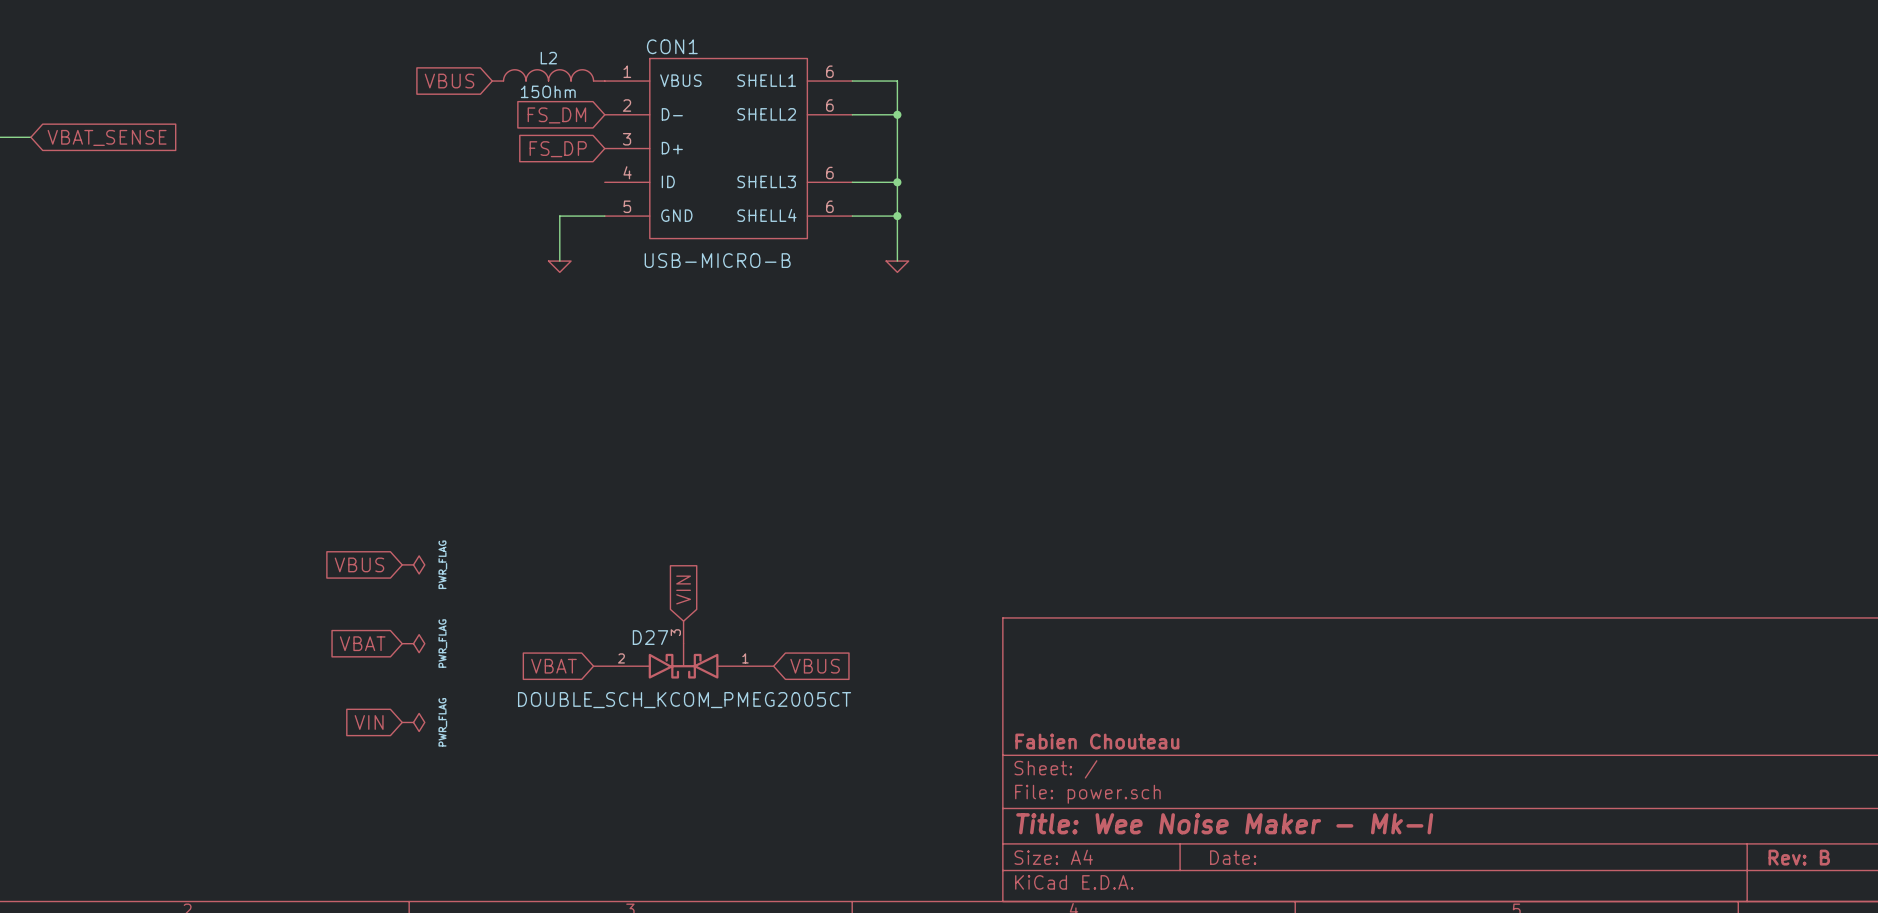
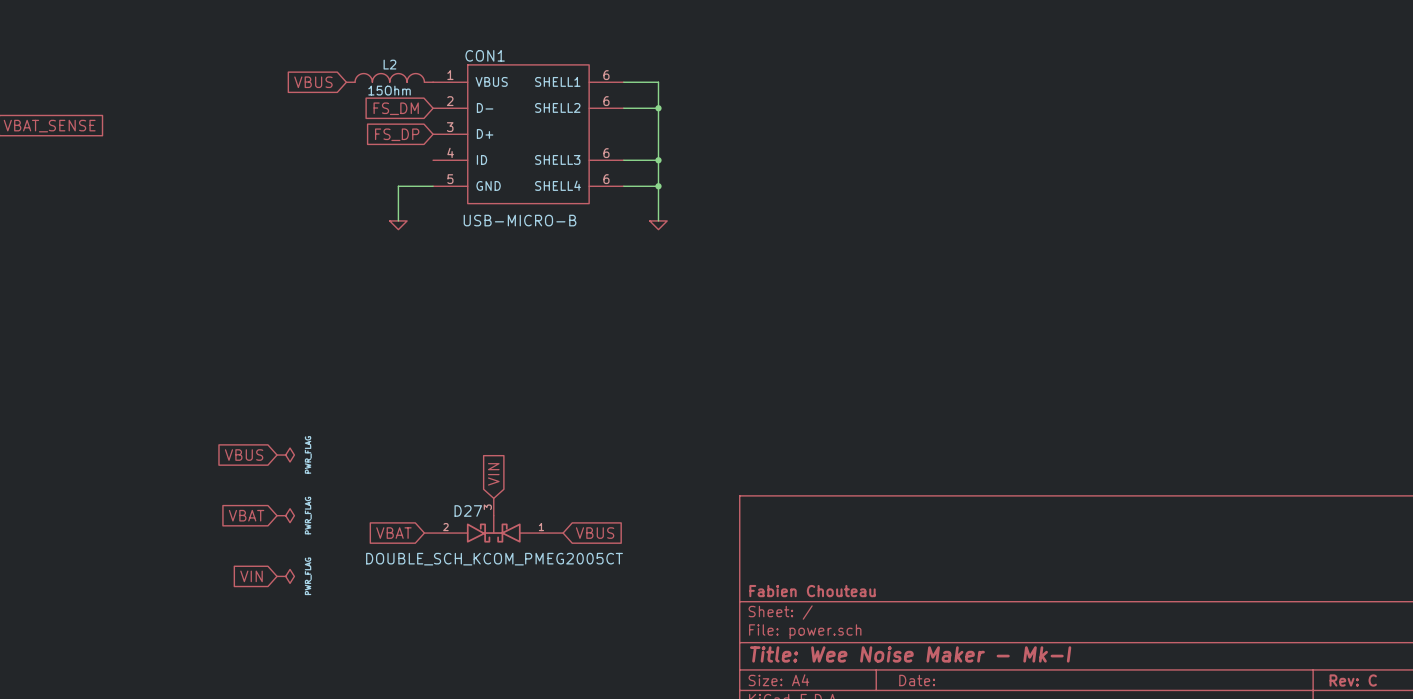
title block: Rev: B (1799, 857) -> Rev: C (1353, 680)

